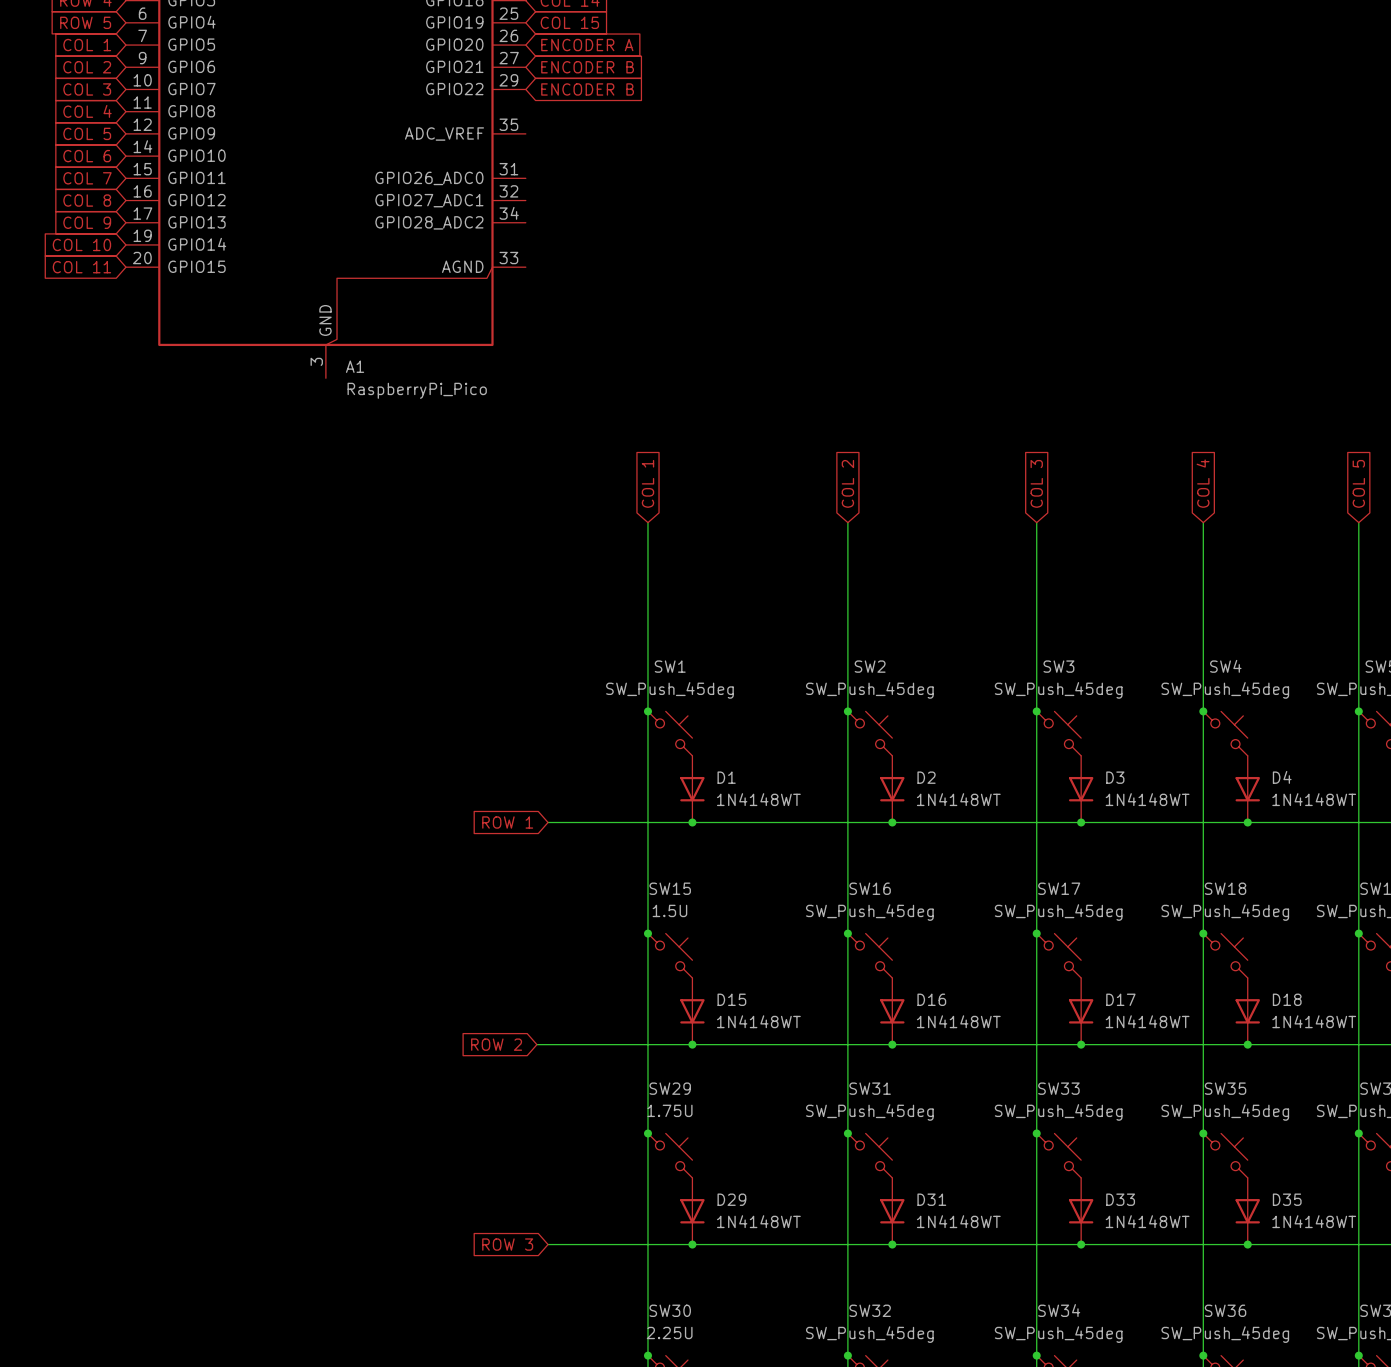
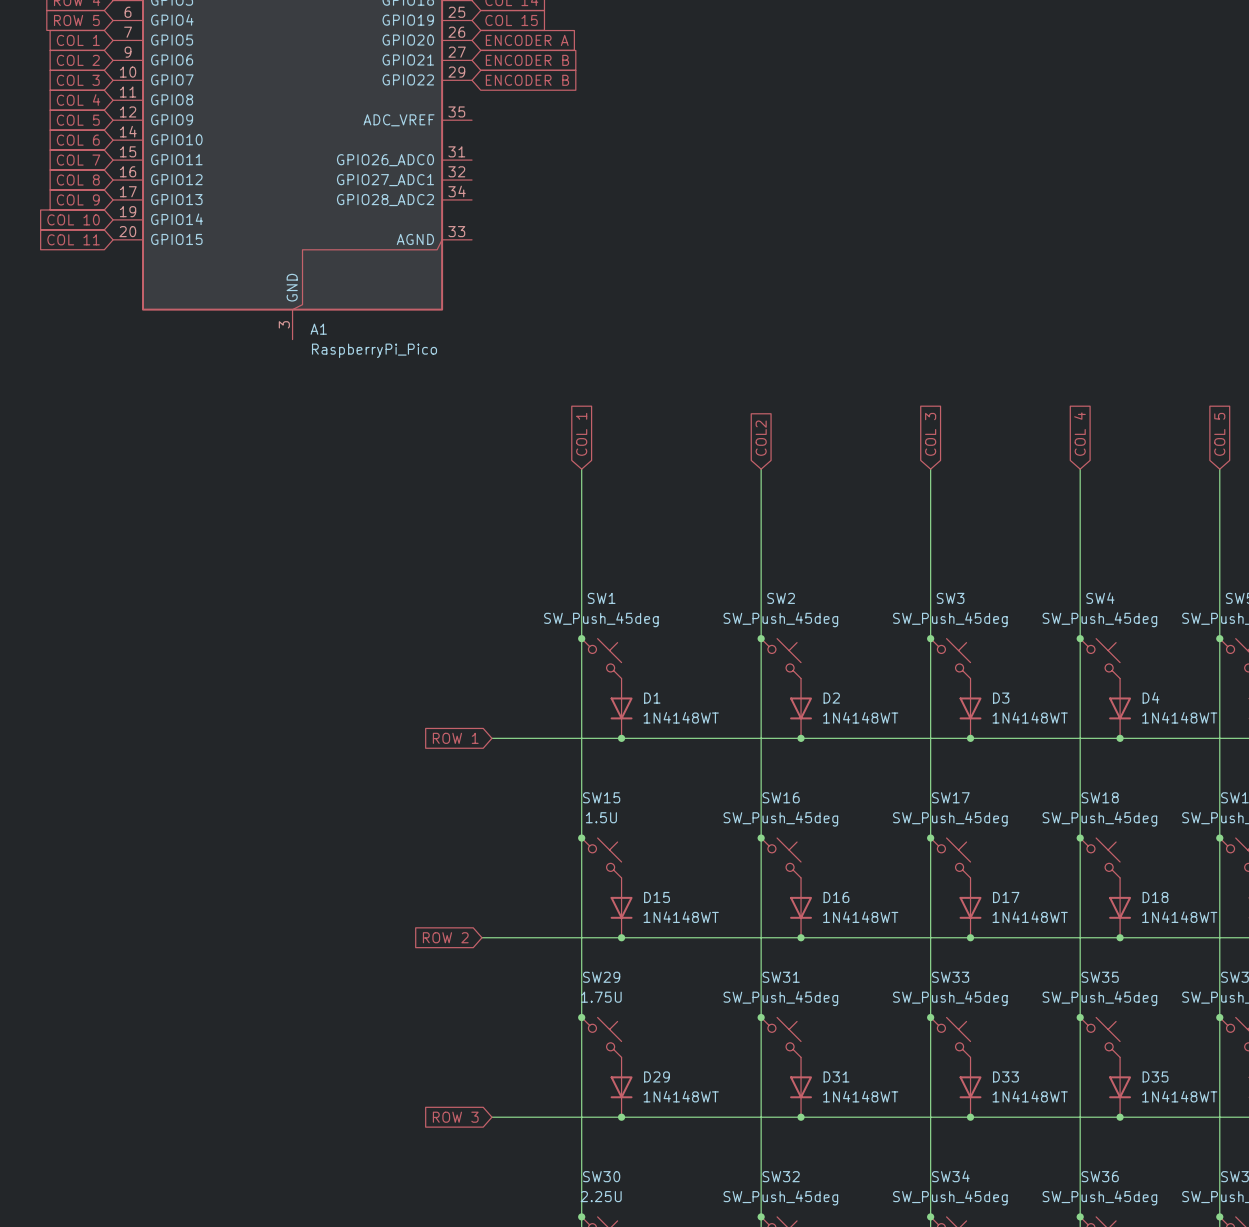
global label: COL 2 (847, 483) -> COL2 (761, 438)

